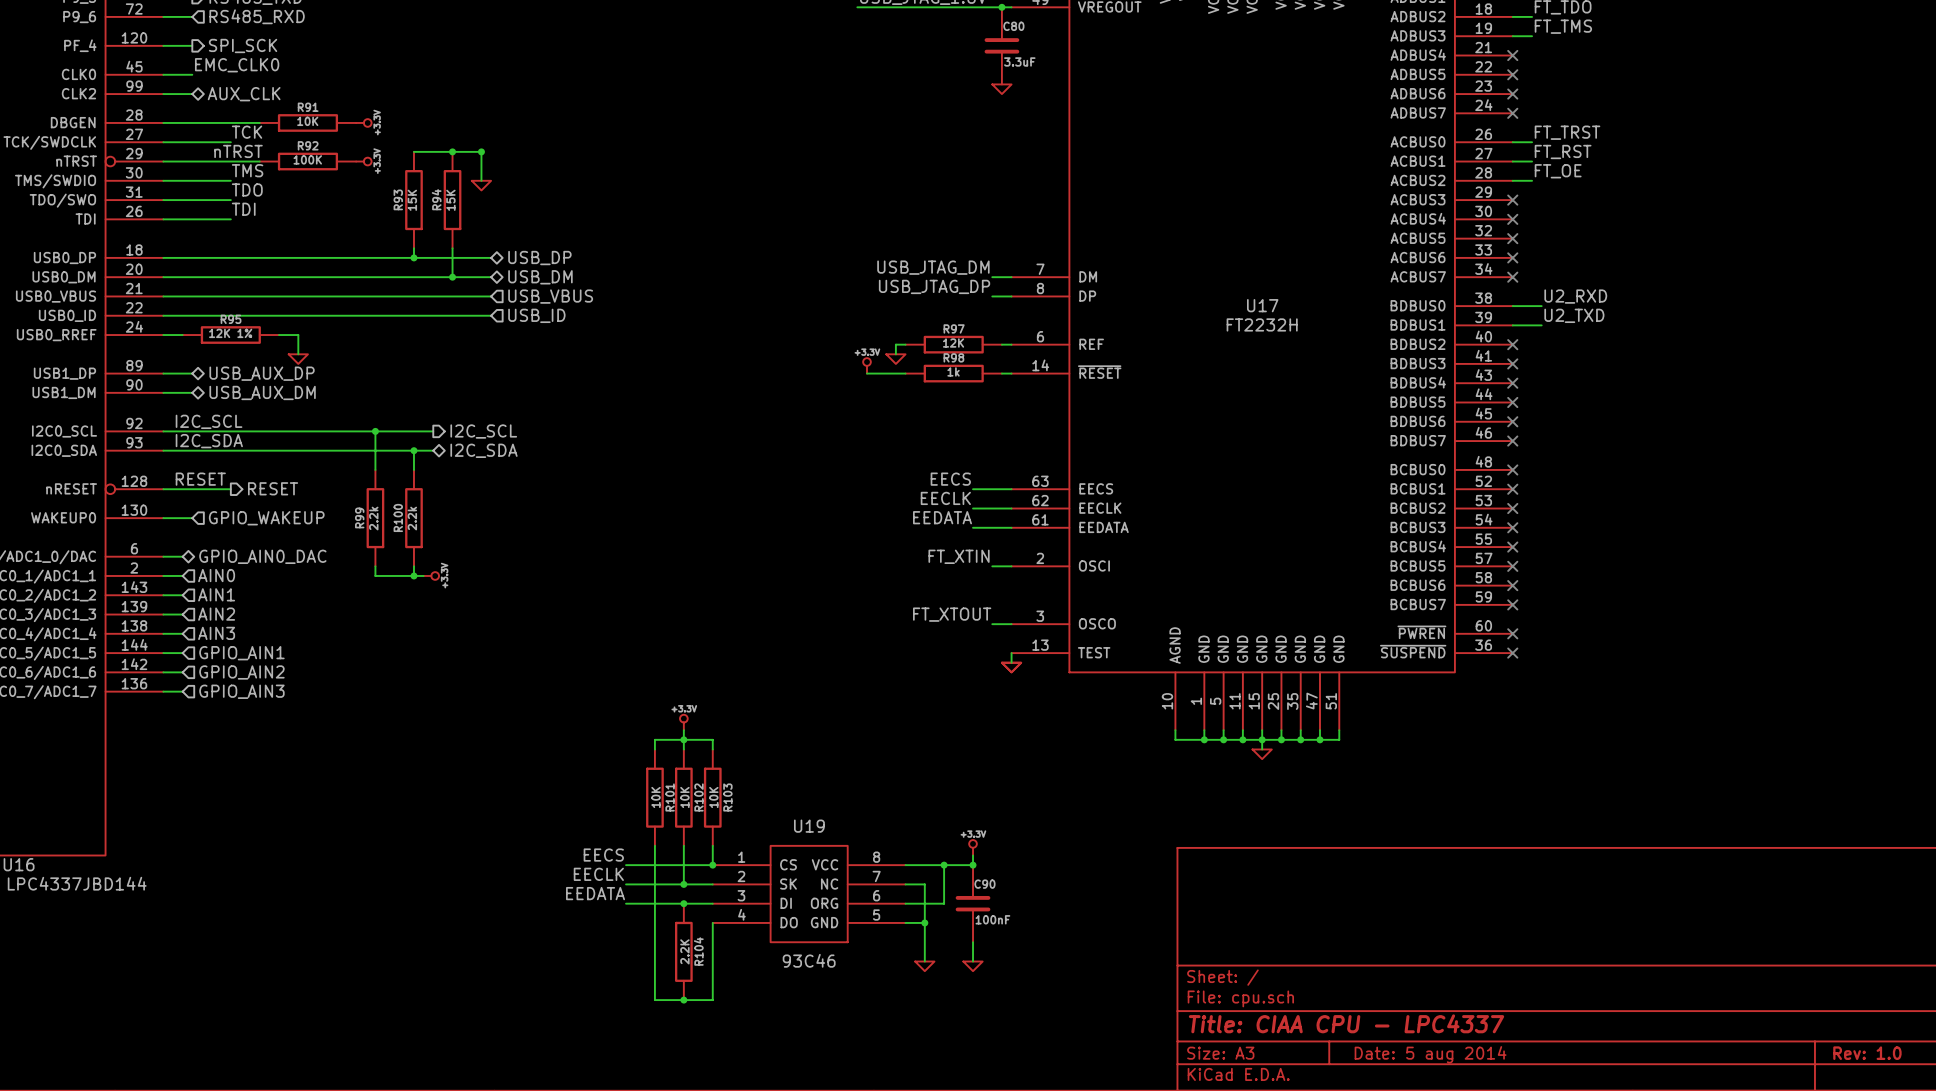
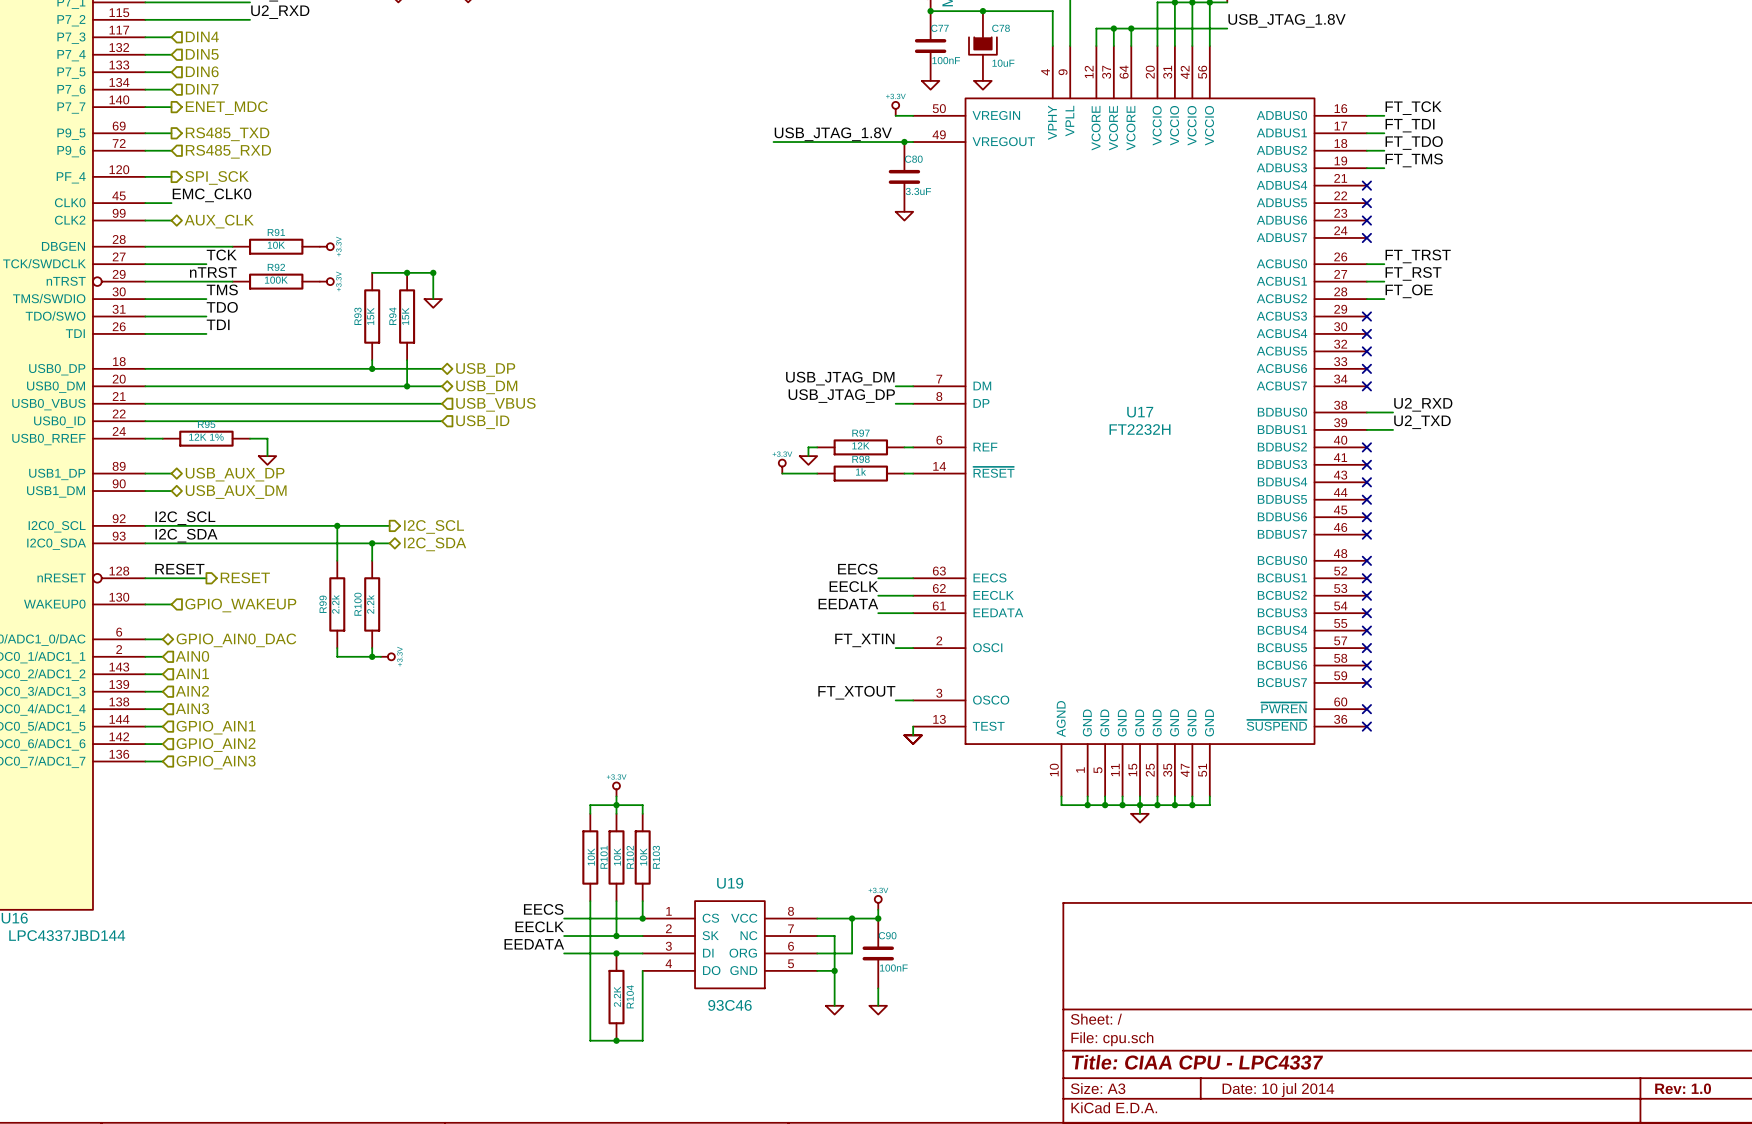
title block: Date: 5 aug 2014 (1430, 1054) -> Date: 10 jul 2014 (1278, 1090)

